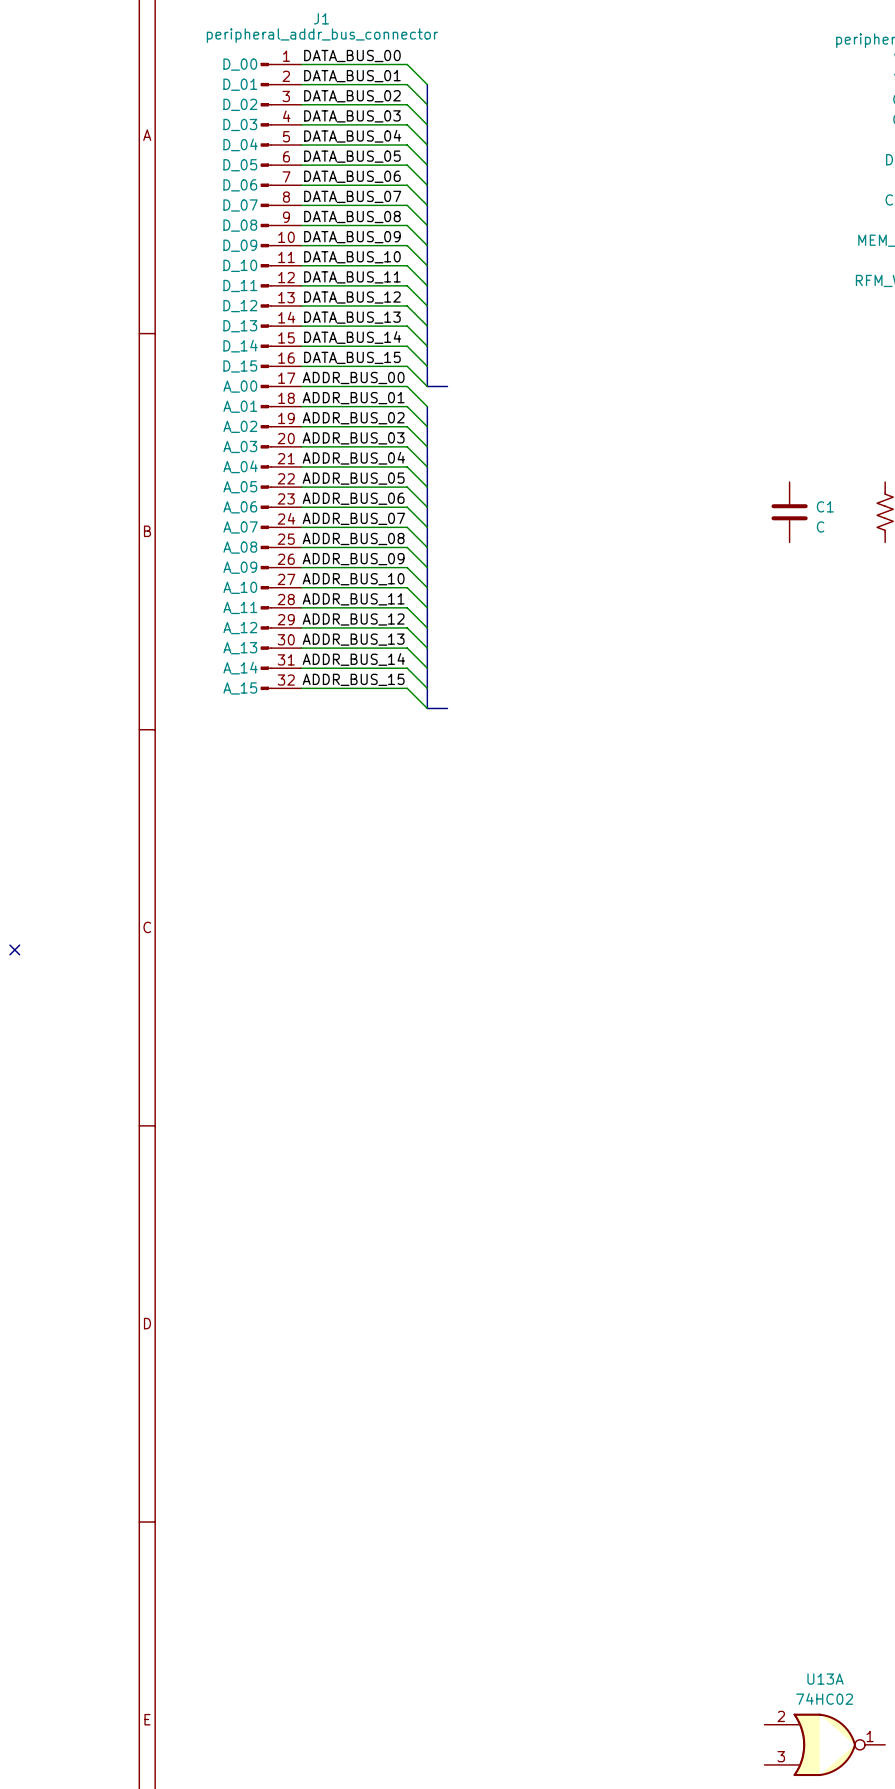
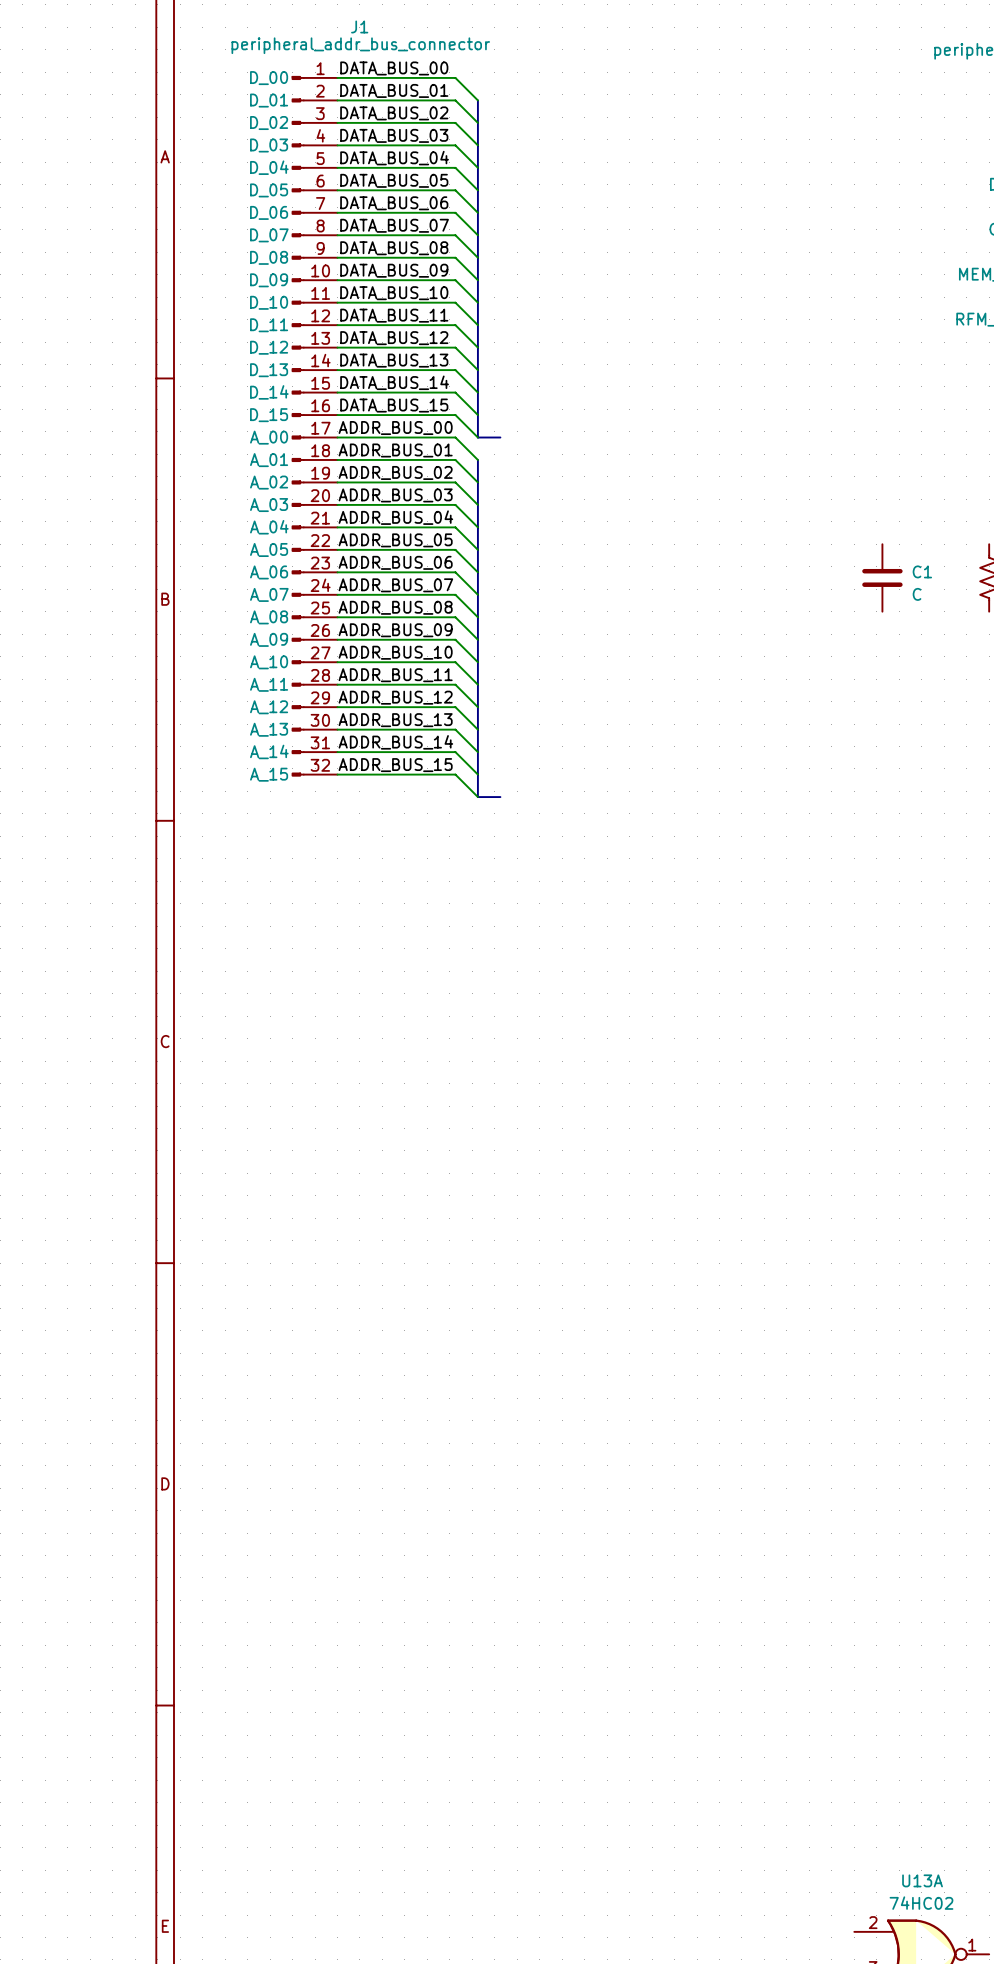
no-connect mark: (14, 949) -> none

